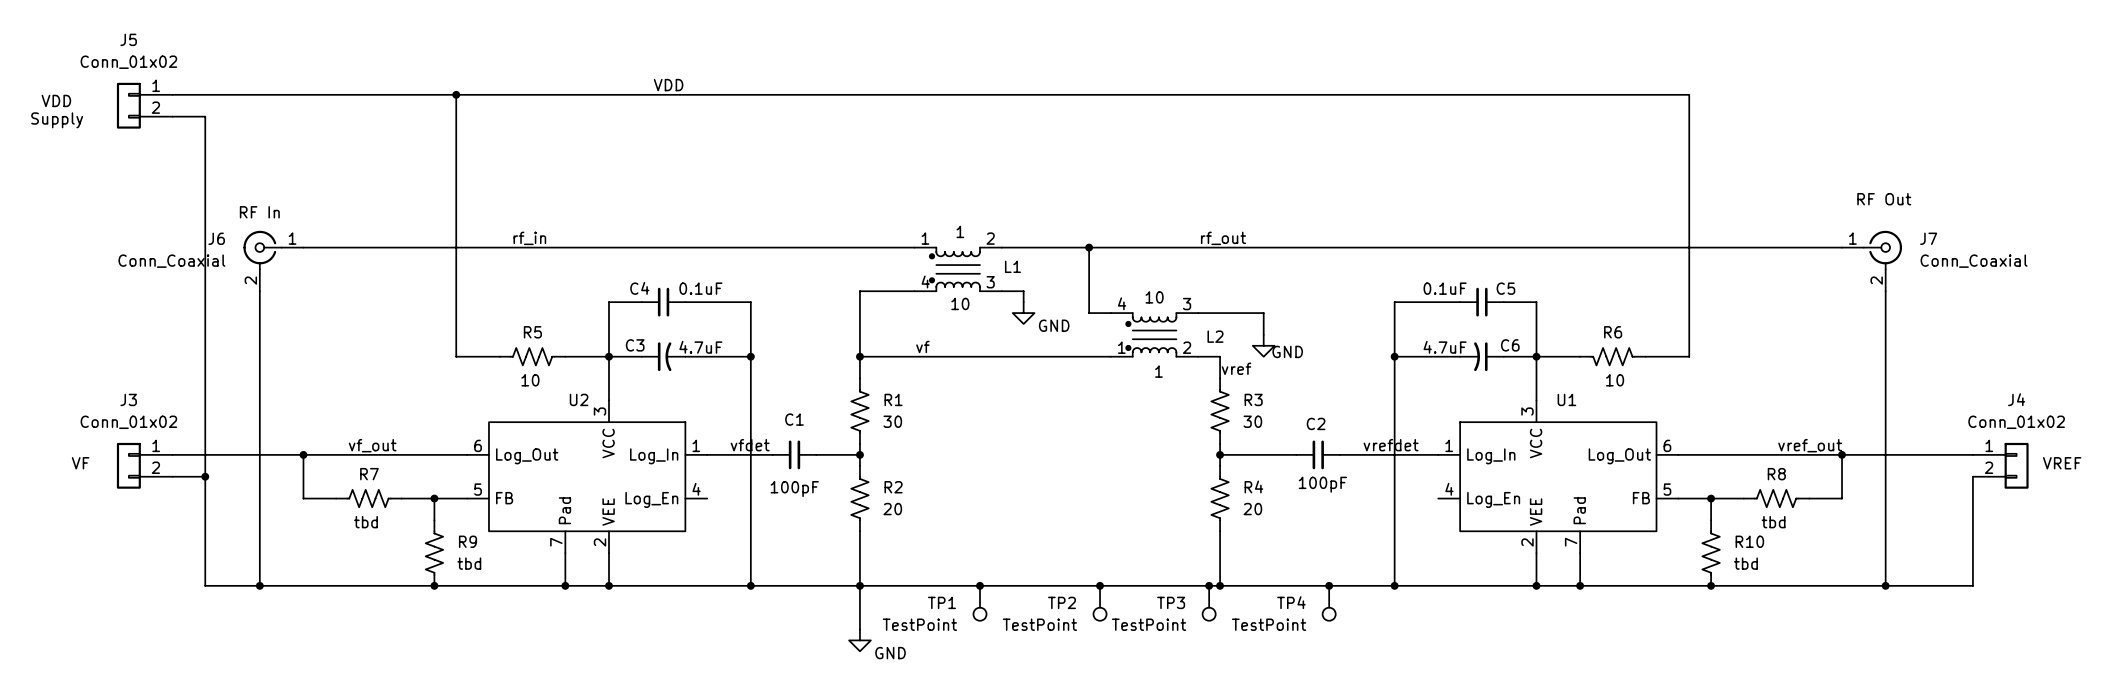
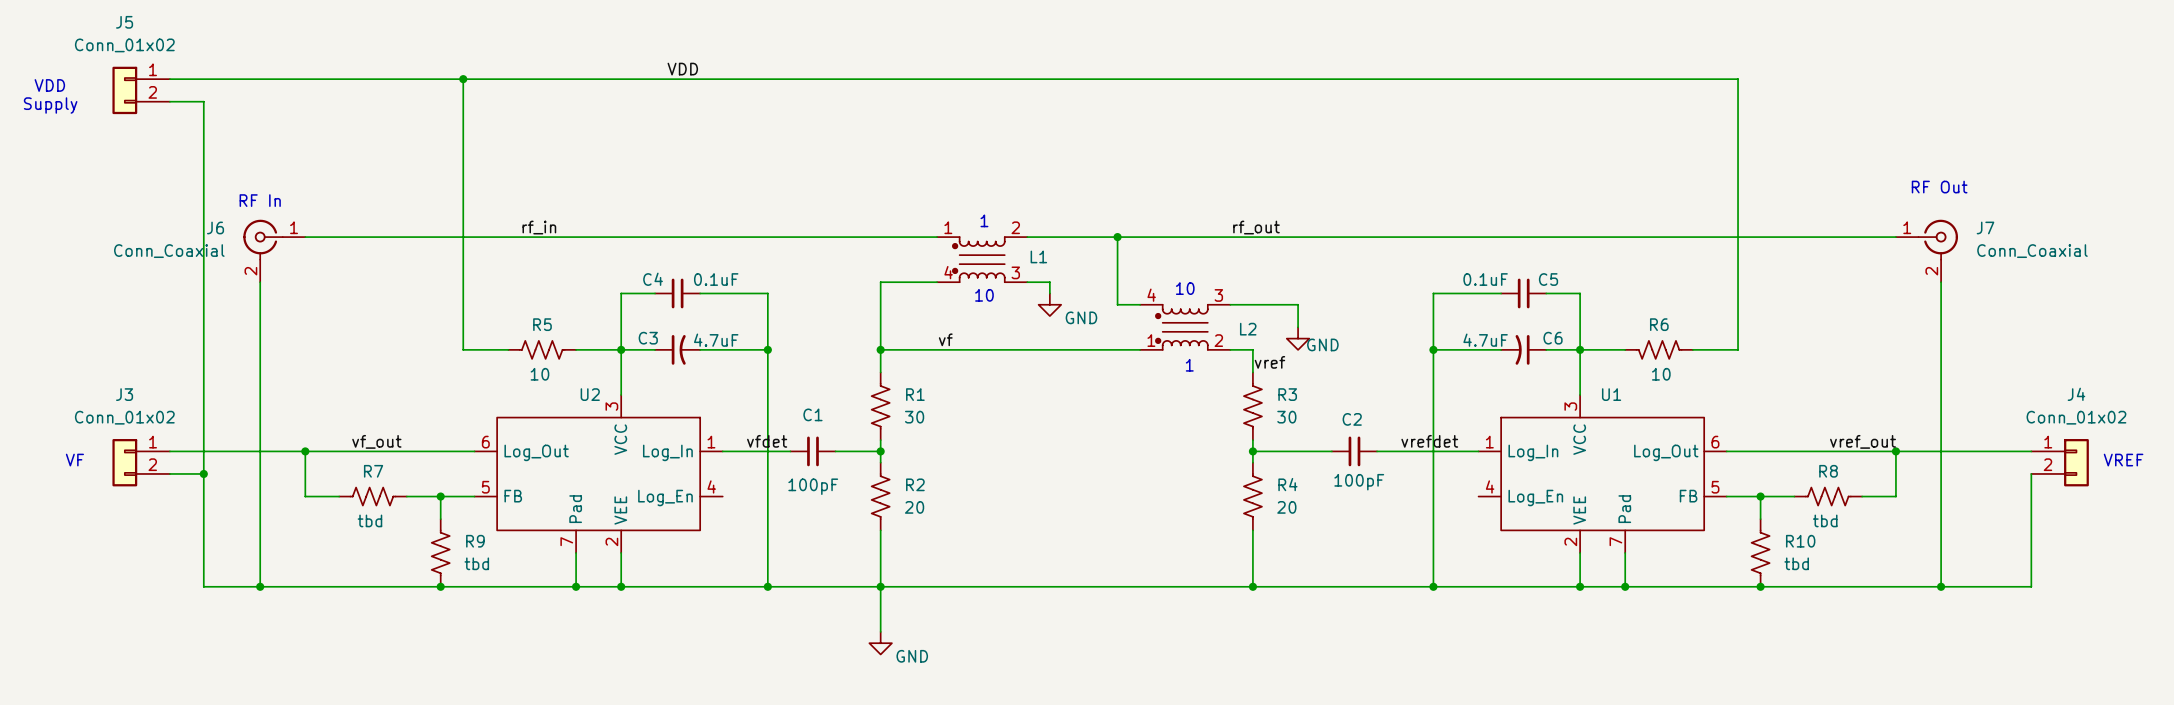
junction: (979, 585) -> none
junction: (1100, 585) -> none
junction: (1209, 585) -> none
junction: (1329, 585) -> none
TP1: TestPoint (979, 603) -> none
TP2: TestPoint (1100, 603) -> none
TP3: TestPoint (1209, 603) -> none
TP4: TestPoint (1329, 603) -> none

